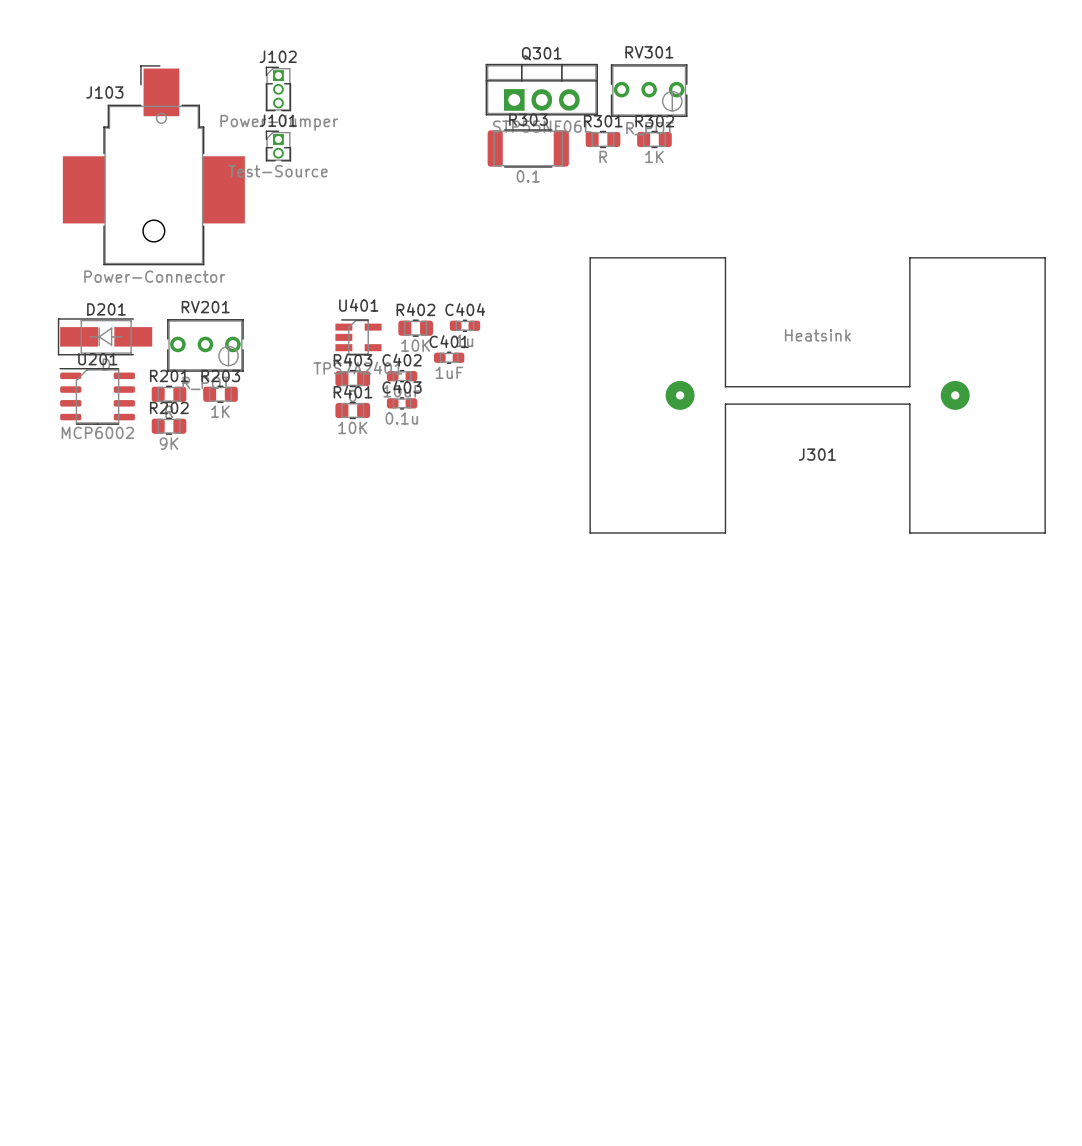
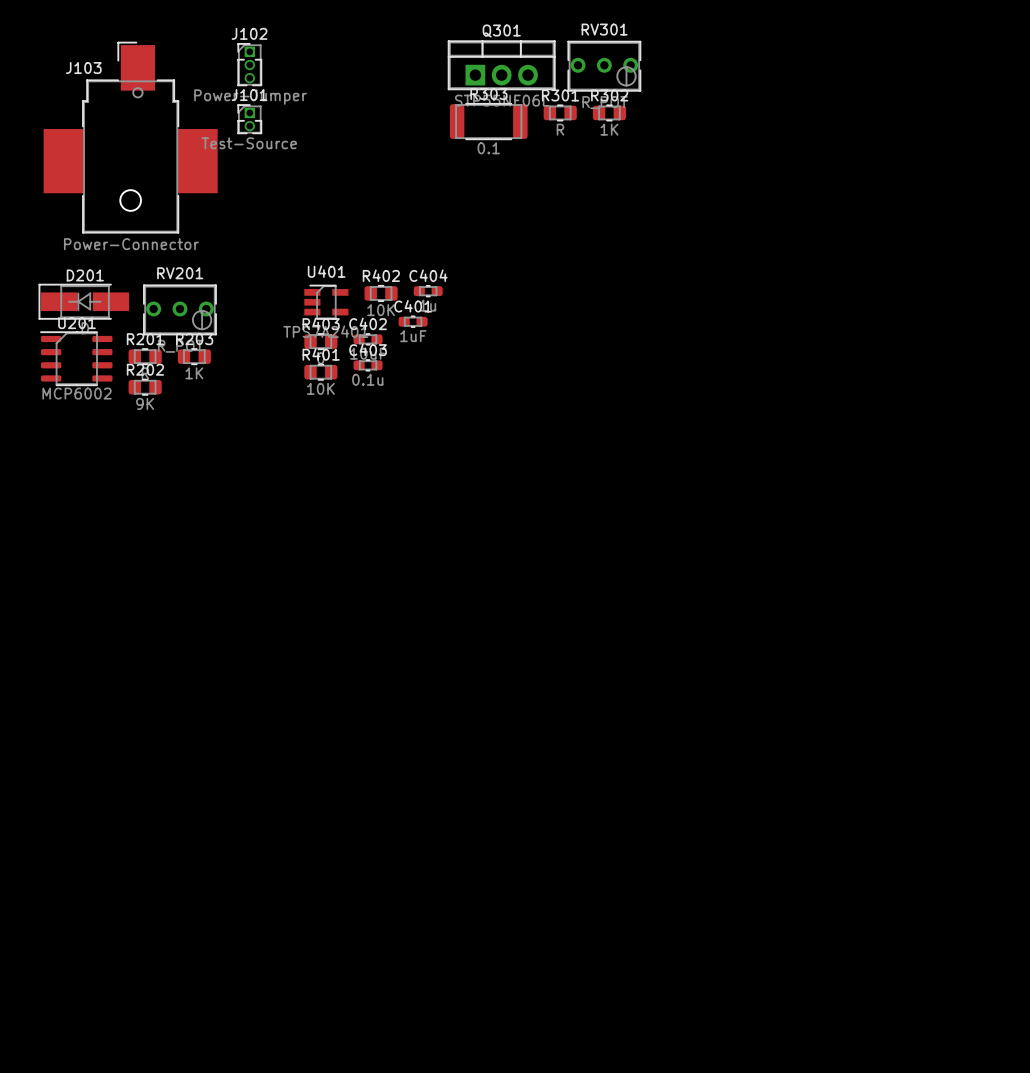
J301: Heatsink (817, 395) -> none

